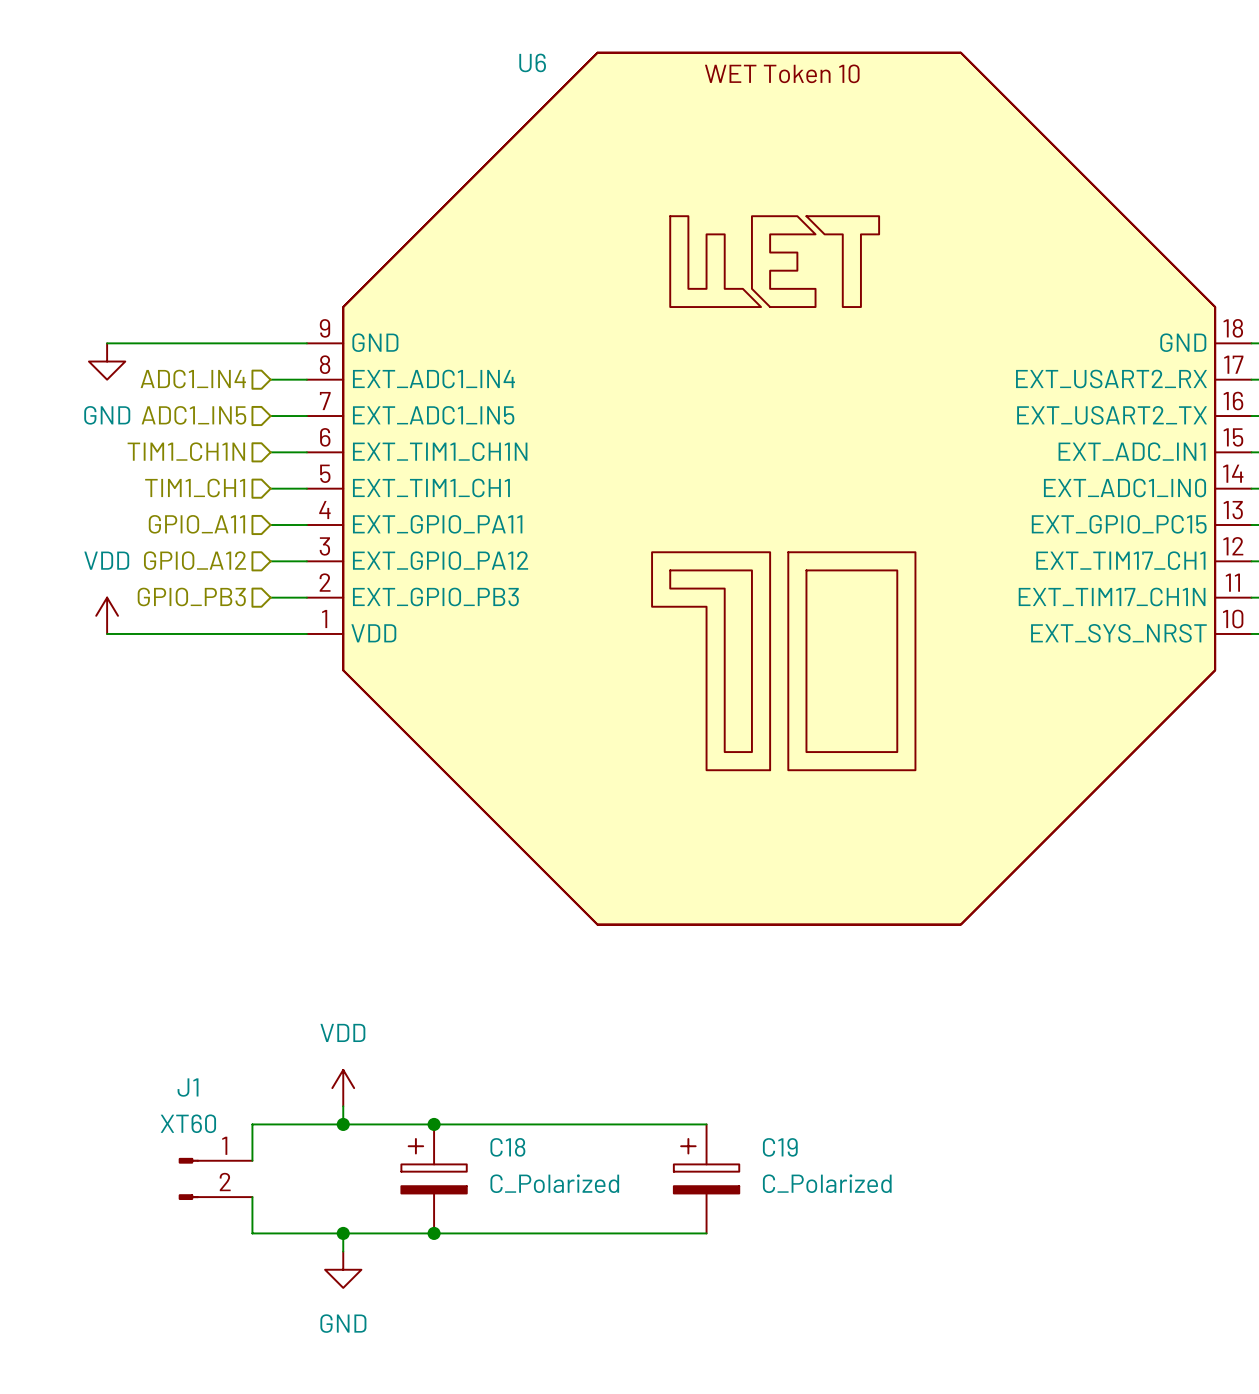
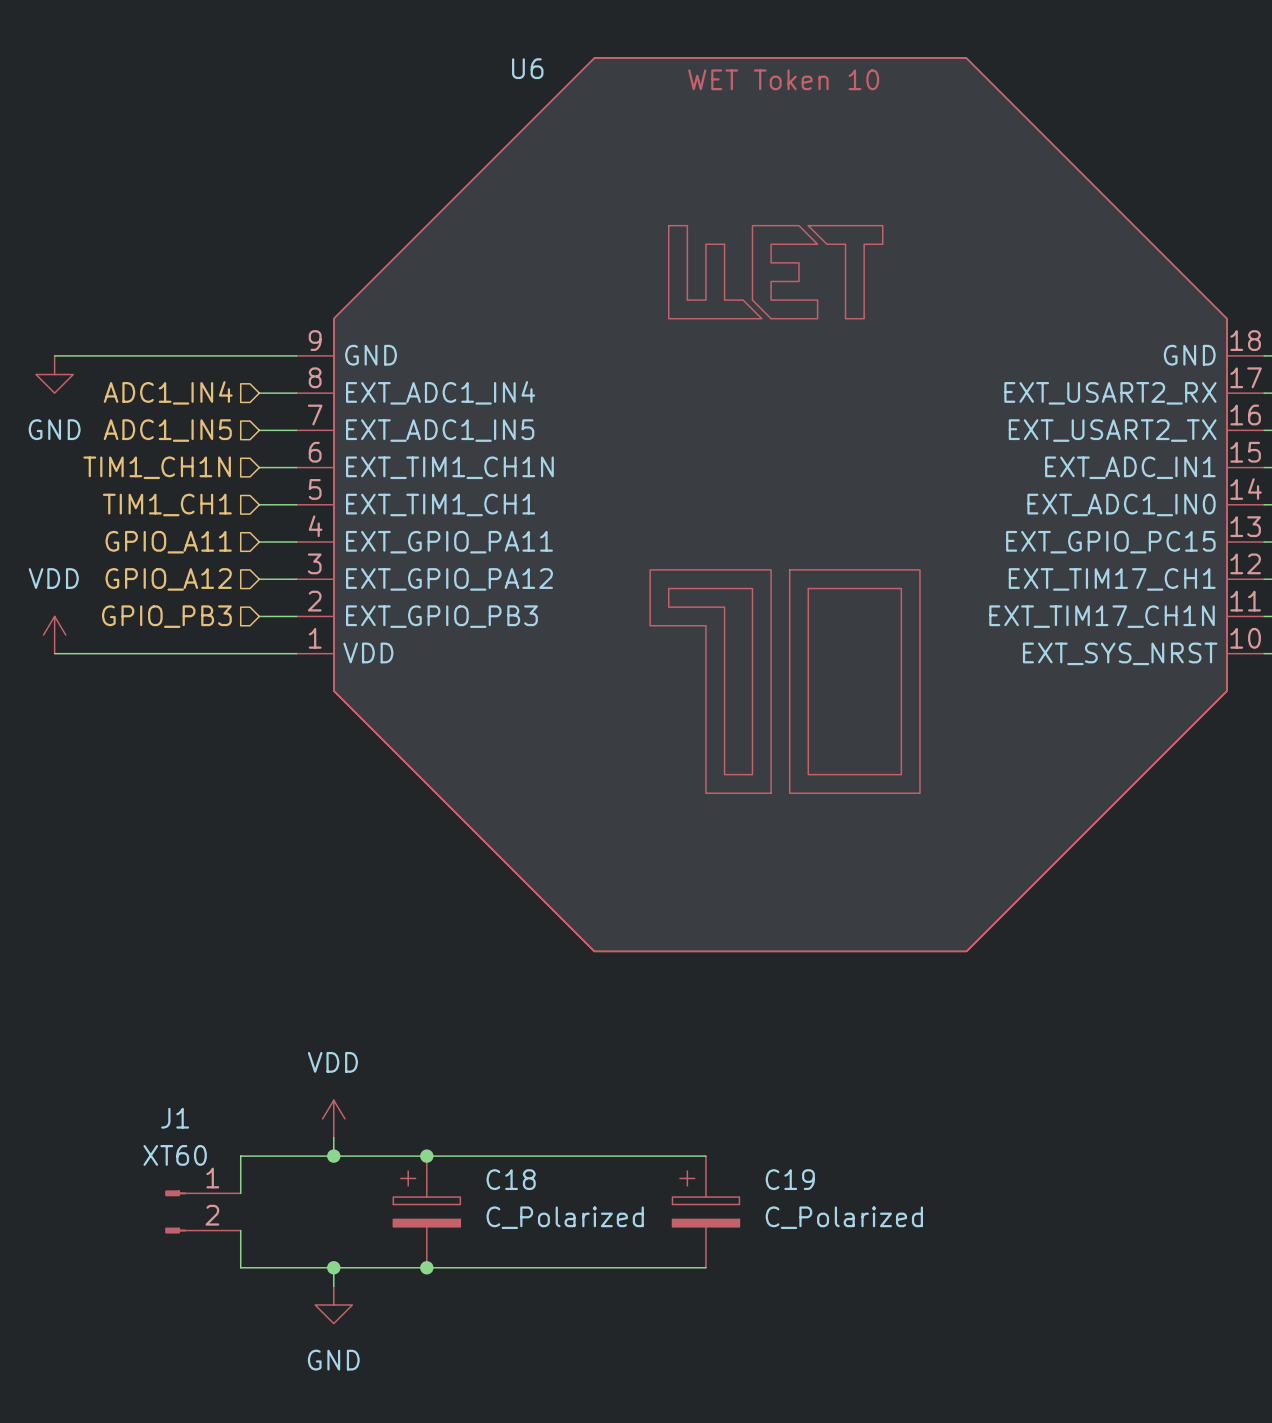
wire: none -> (54, 355) (91, 355)
power symbol position: GND (107, 361) -> GND (54, 374)
power symbol position: VDD (107, 615) -> VDD (54, 635)
wire: none -> (54, 653) (91, 653)

